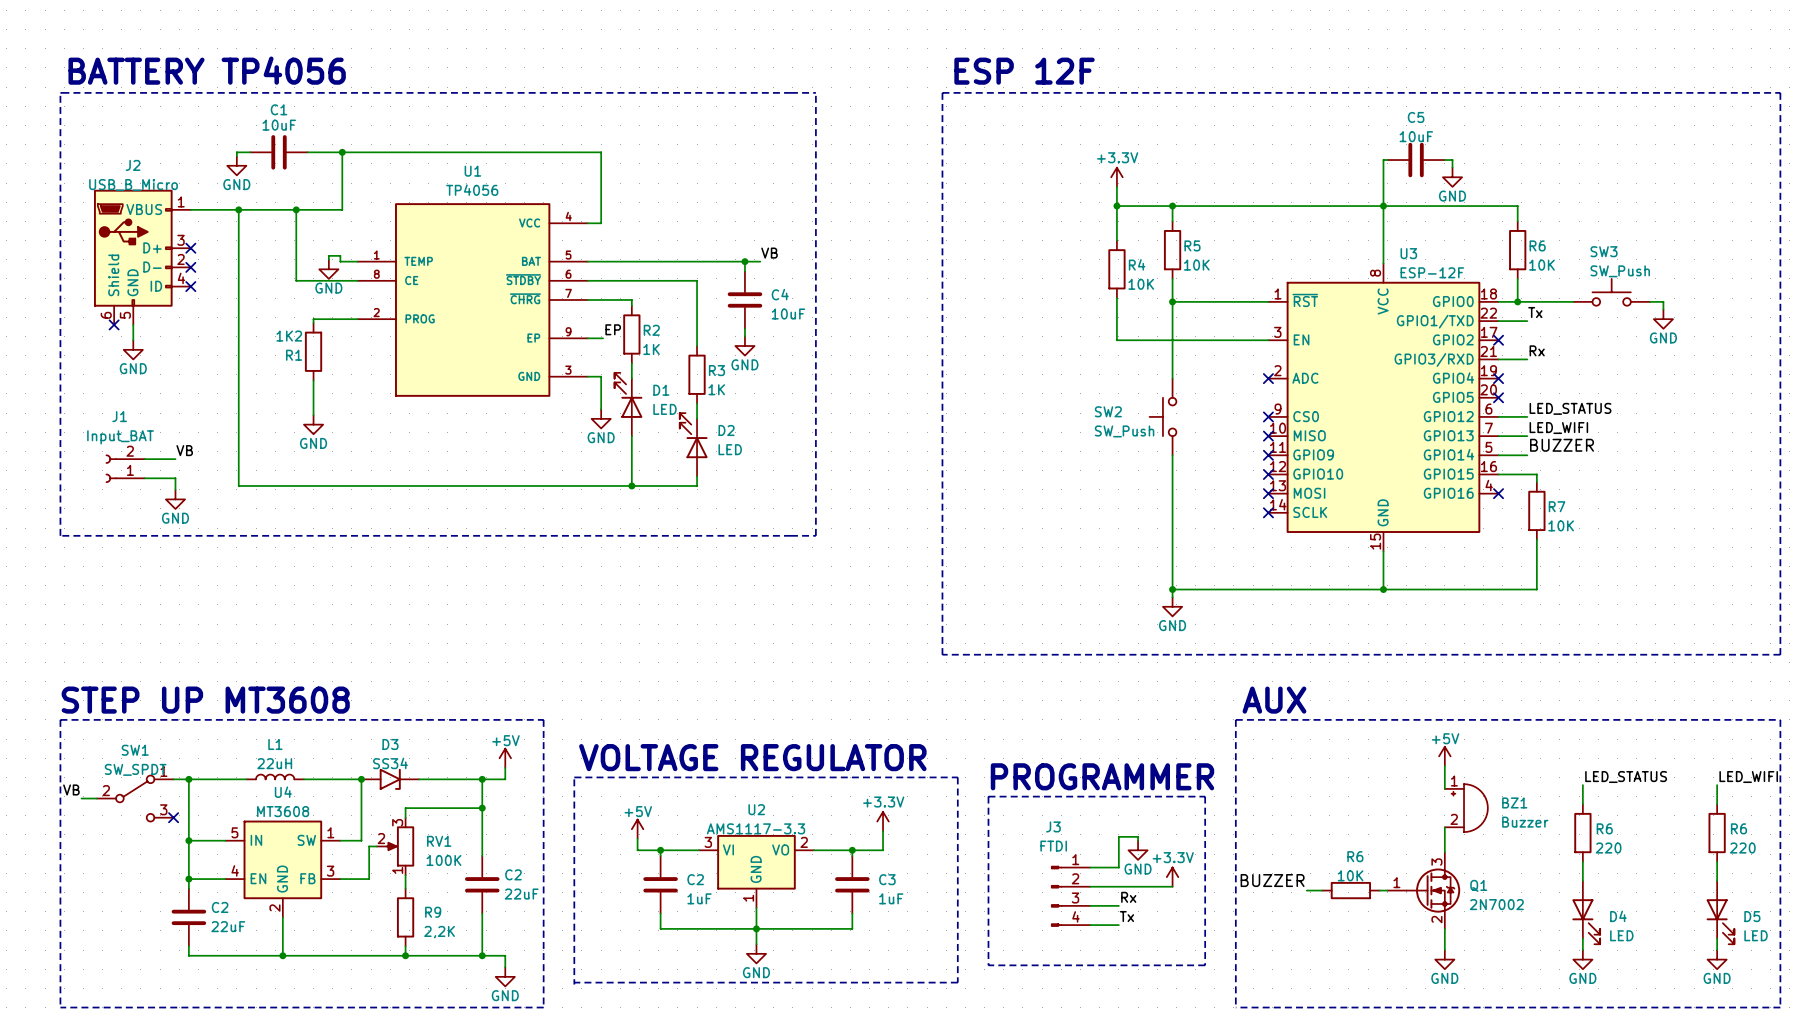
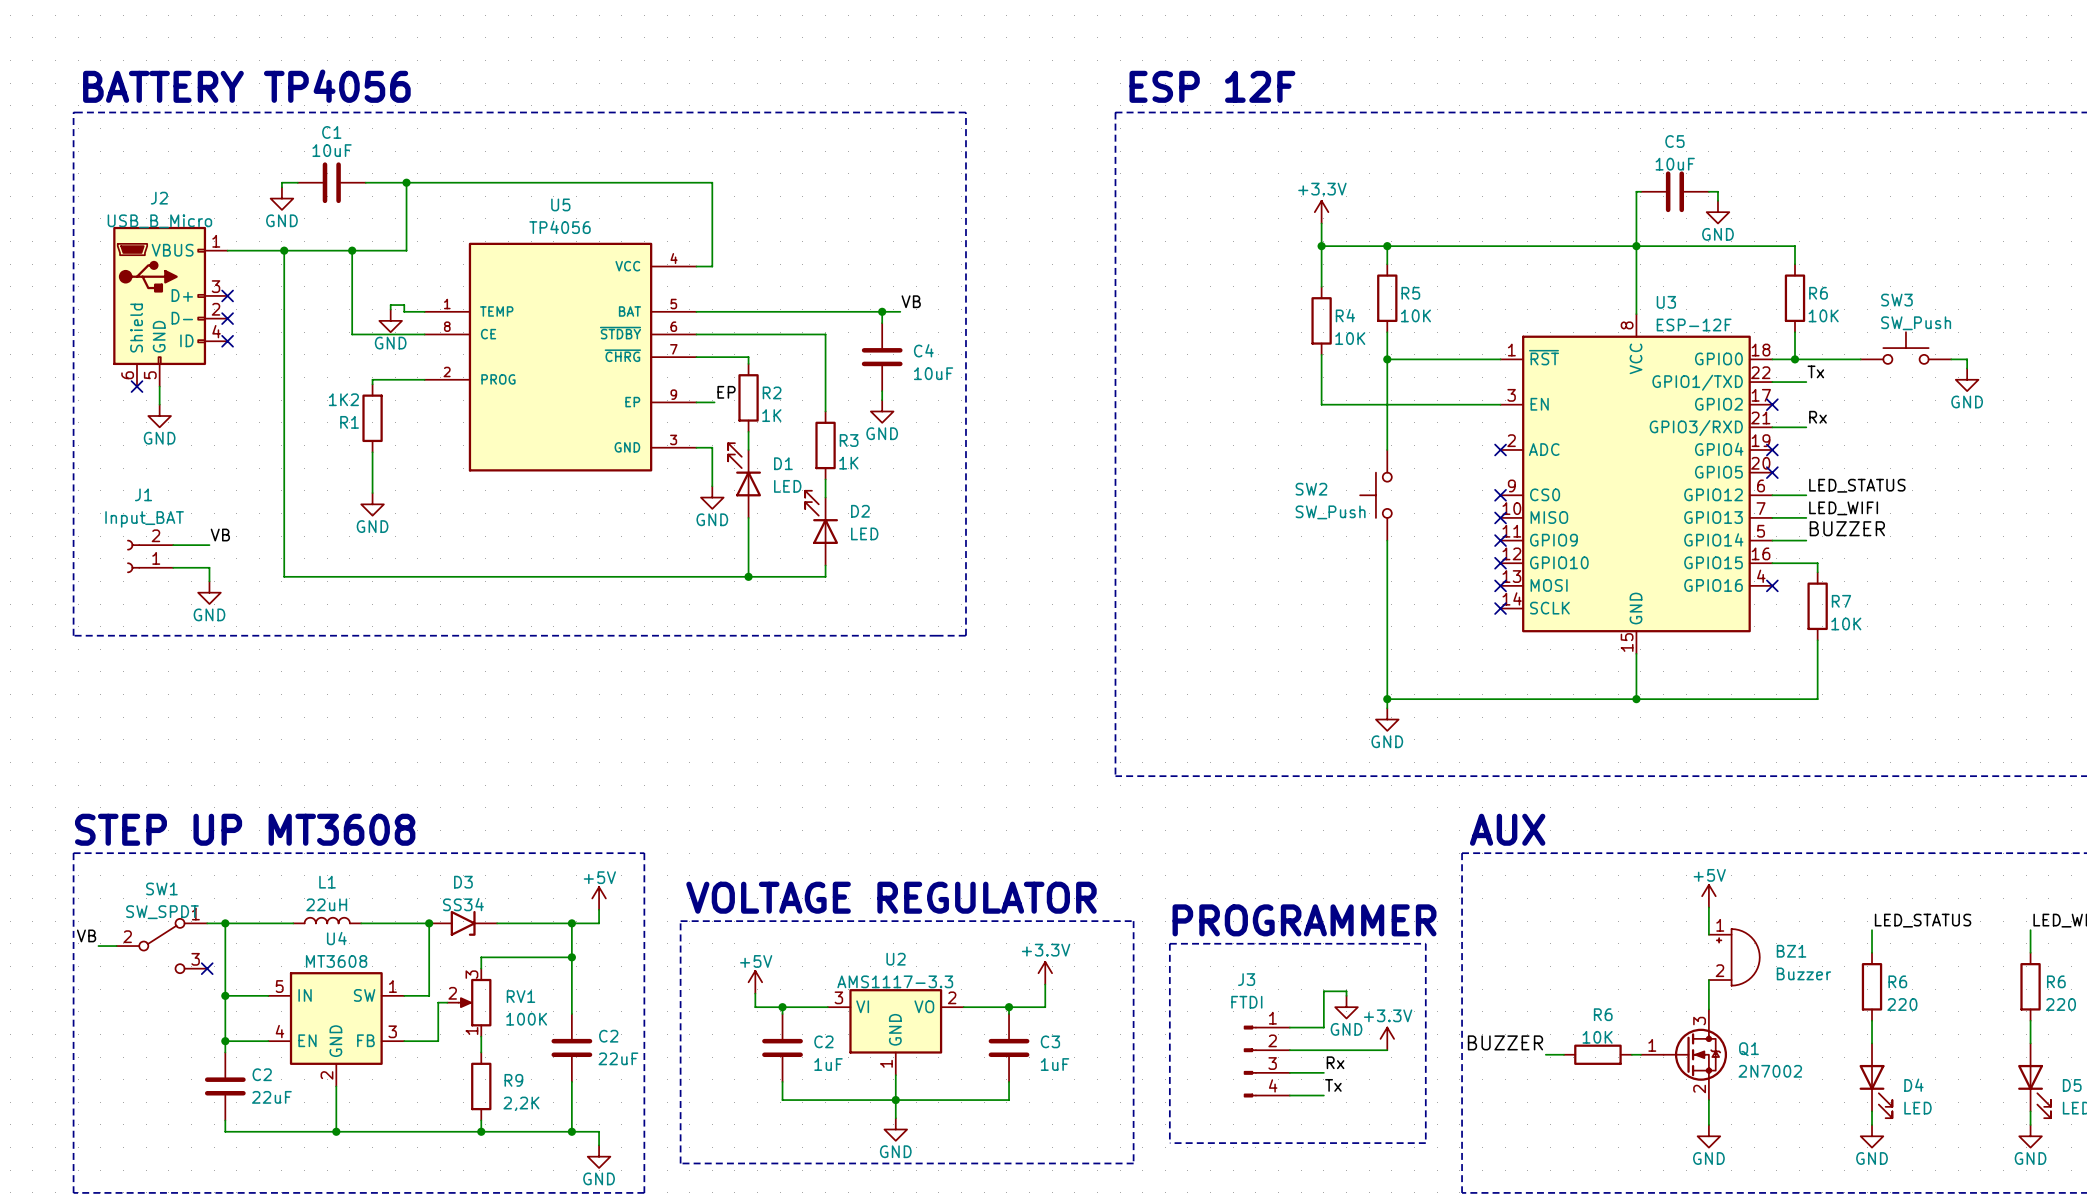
U1 name: U1 (472, 171) -> U5 (560, 204)

